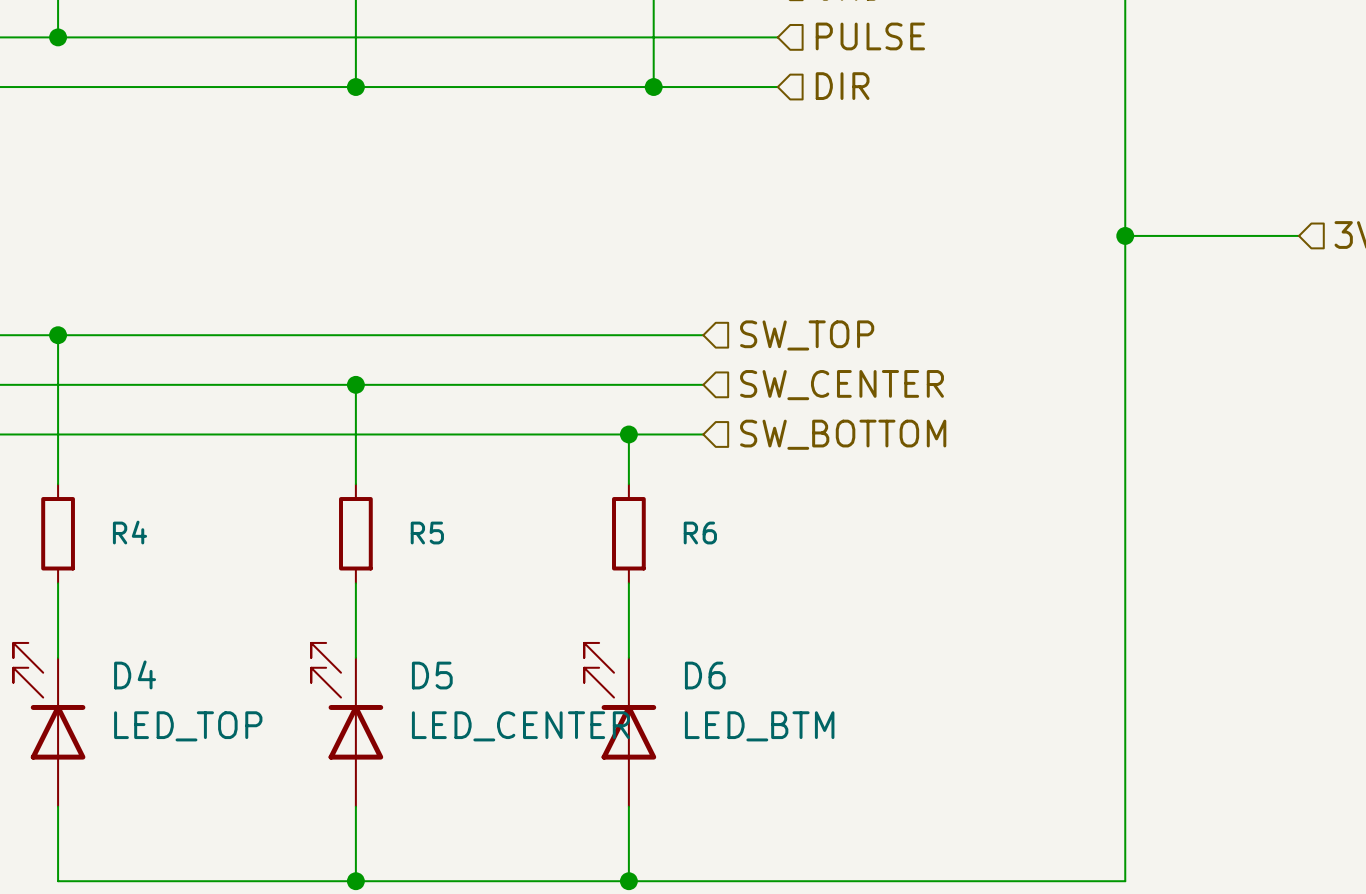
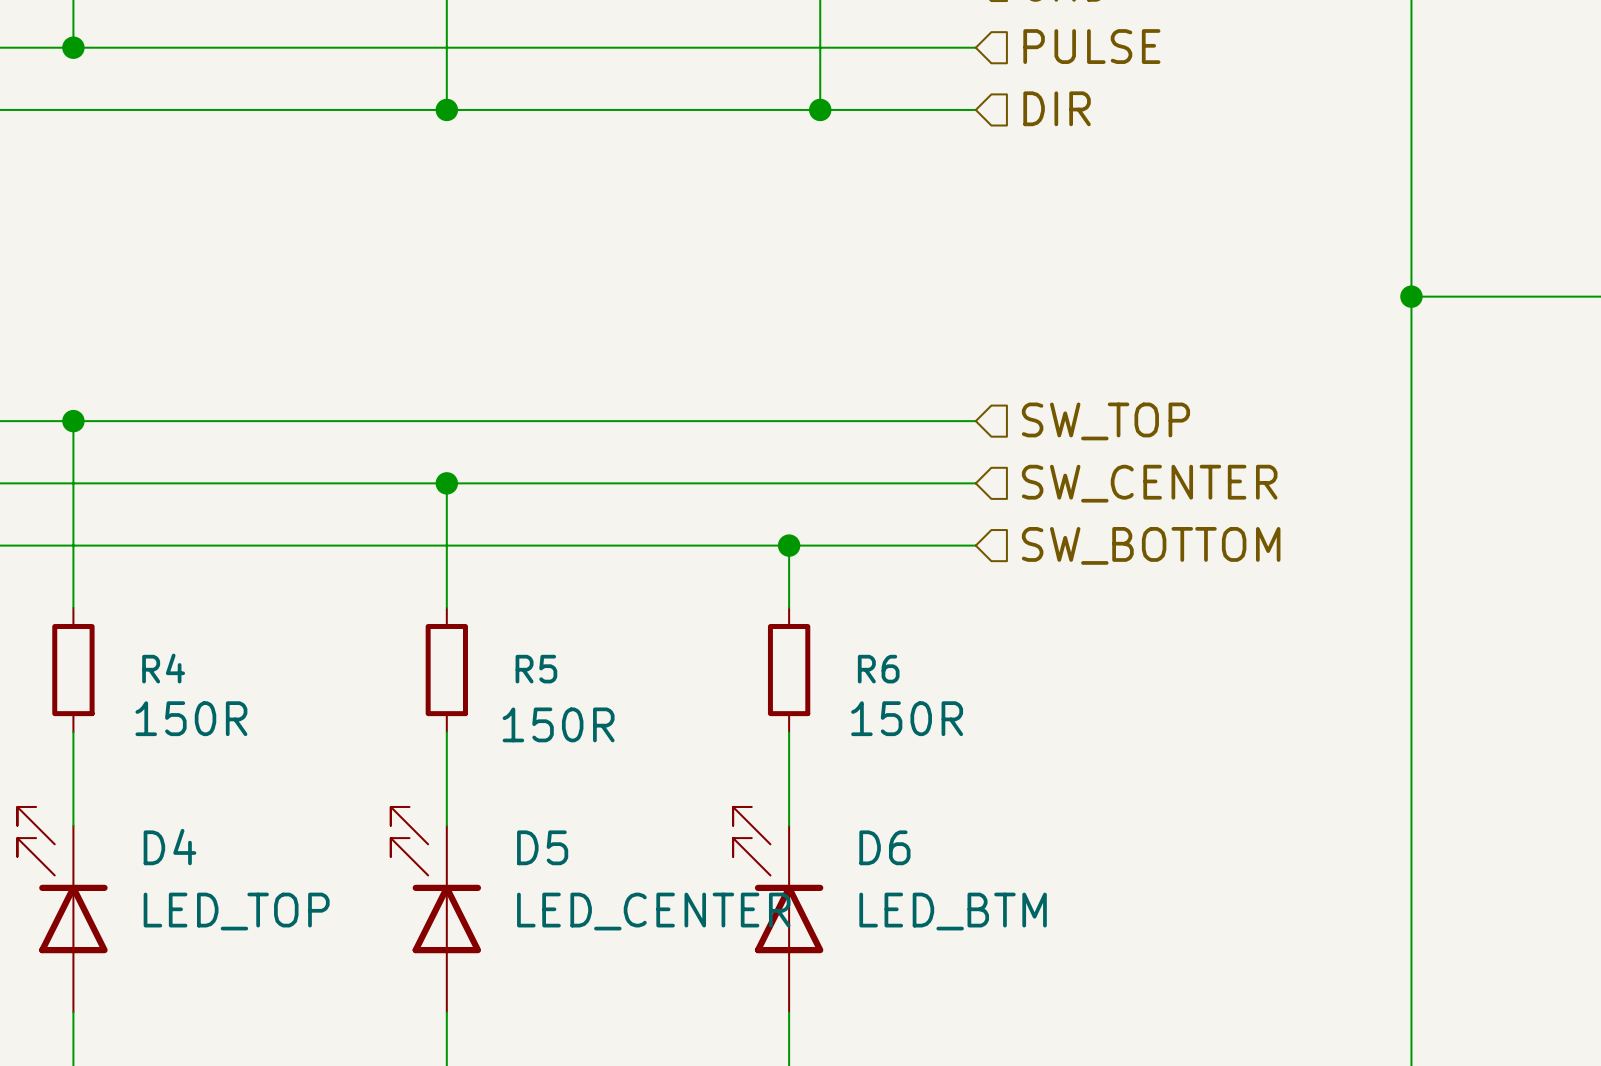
wire: none -> (882, 421) (975, 421)
hierarchical label position: SW_TOP (807, 335) -> SW_TOP (1105, 421)
wire: none -> (882, 483) (975, 483)
hierarchical label position: SW_CENTER (842, 385) -> SW_CENTER (1149, 483)
wire: none -> (882, 545) (975, 545)
hierarchical label position: SW_BOTTOM (843, 434) -> SW_BOTTOM (1151, 545)
R4 value: none -> 150R (191, 718)
R6 value: none -> 150R (907, 718)
R5 value: none -> 150R (558, 724)

